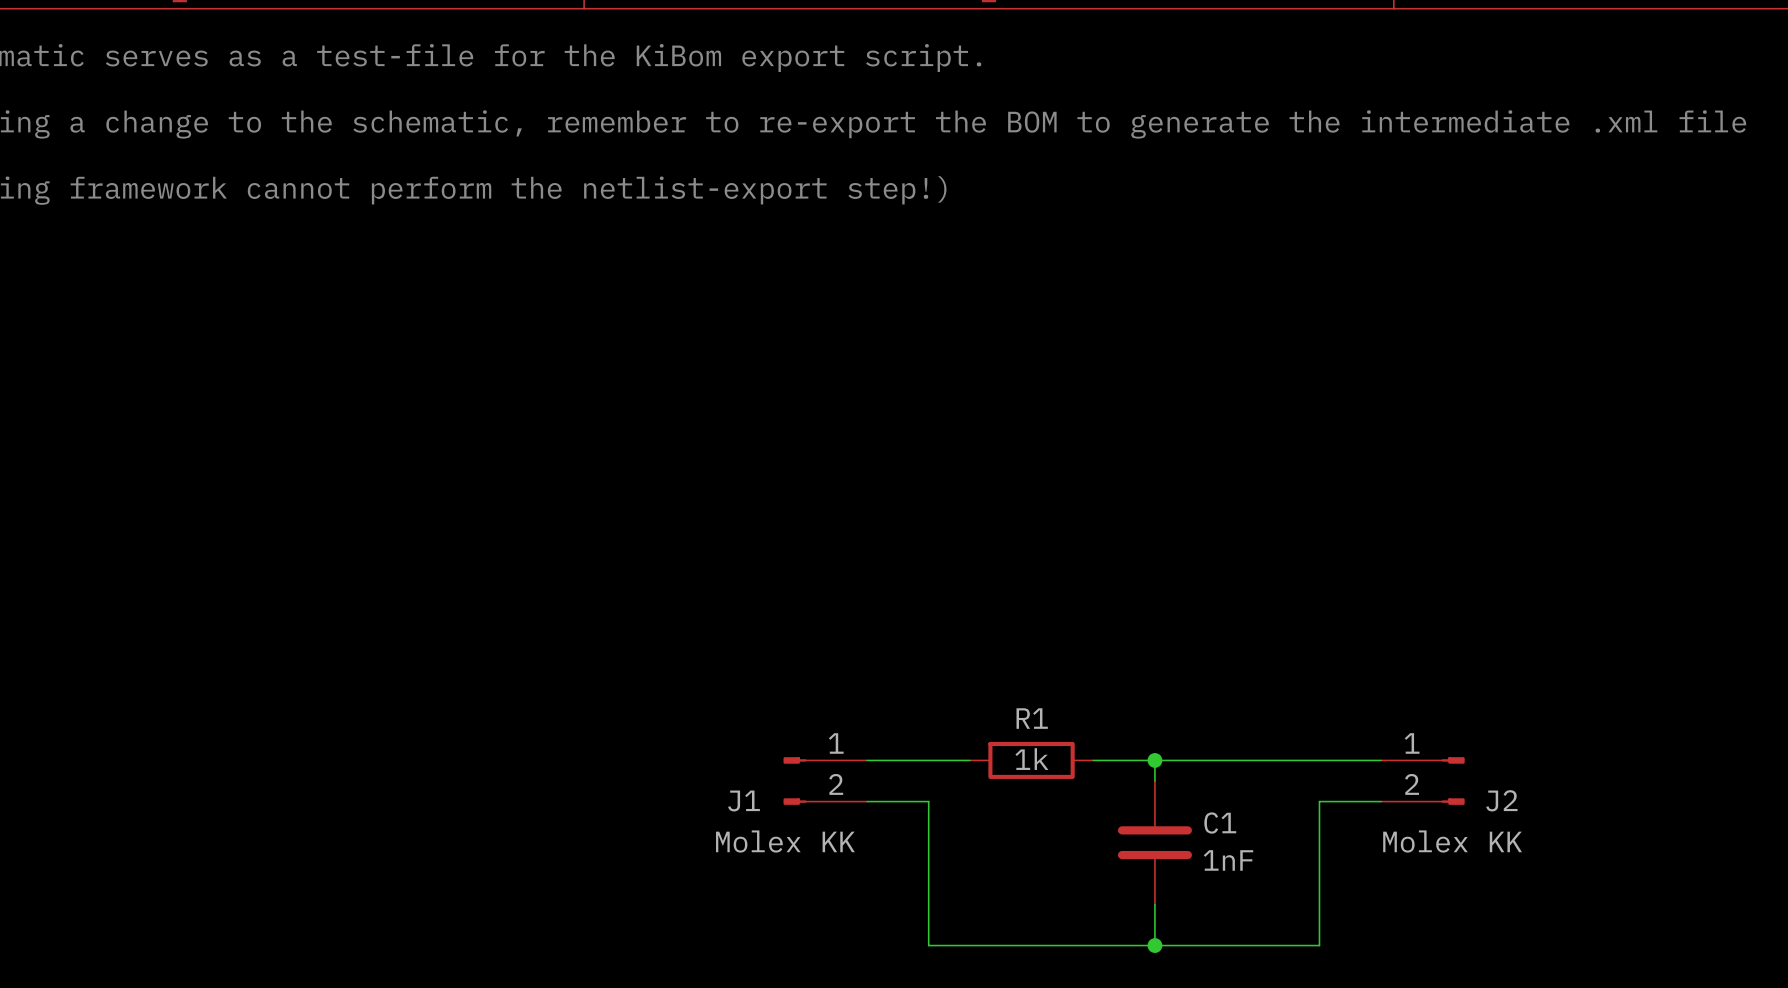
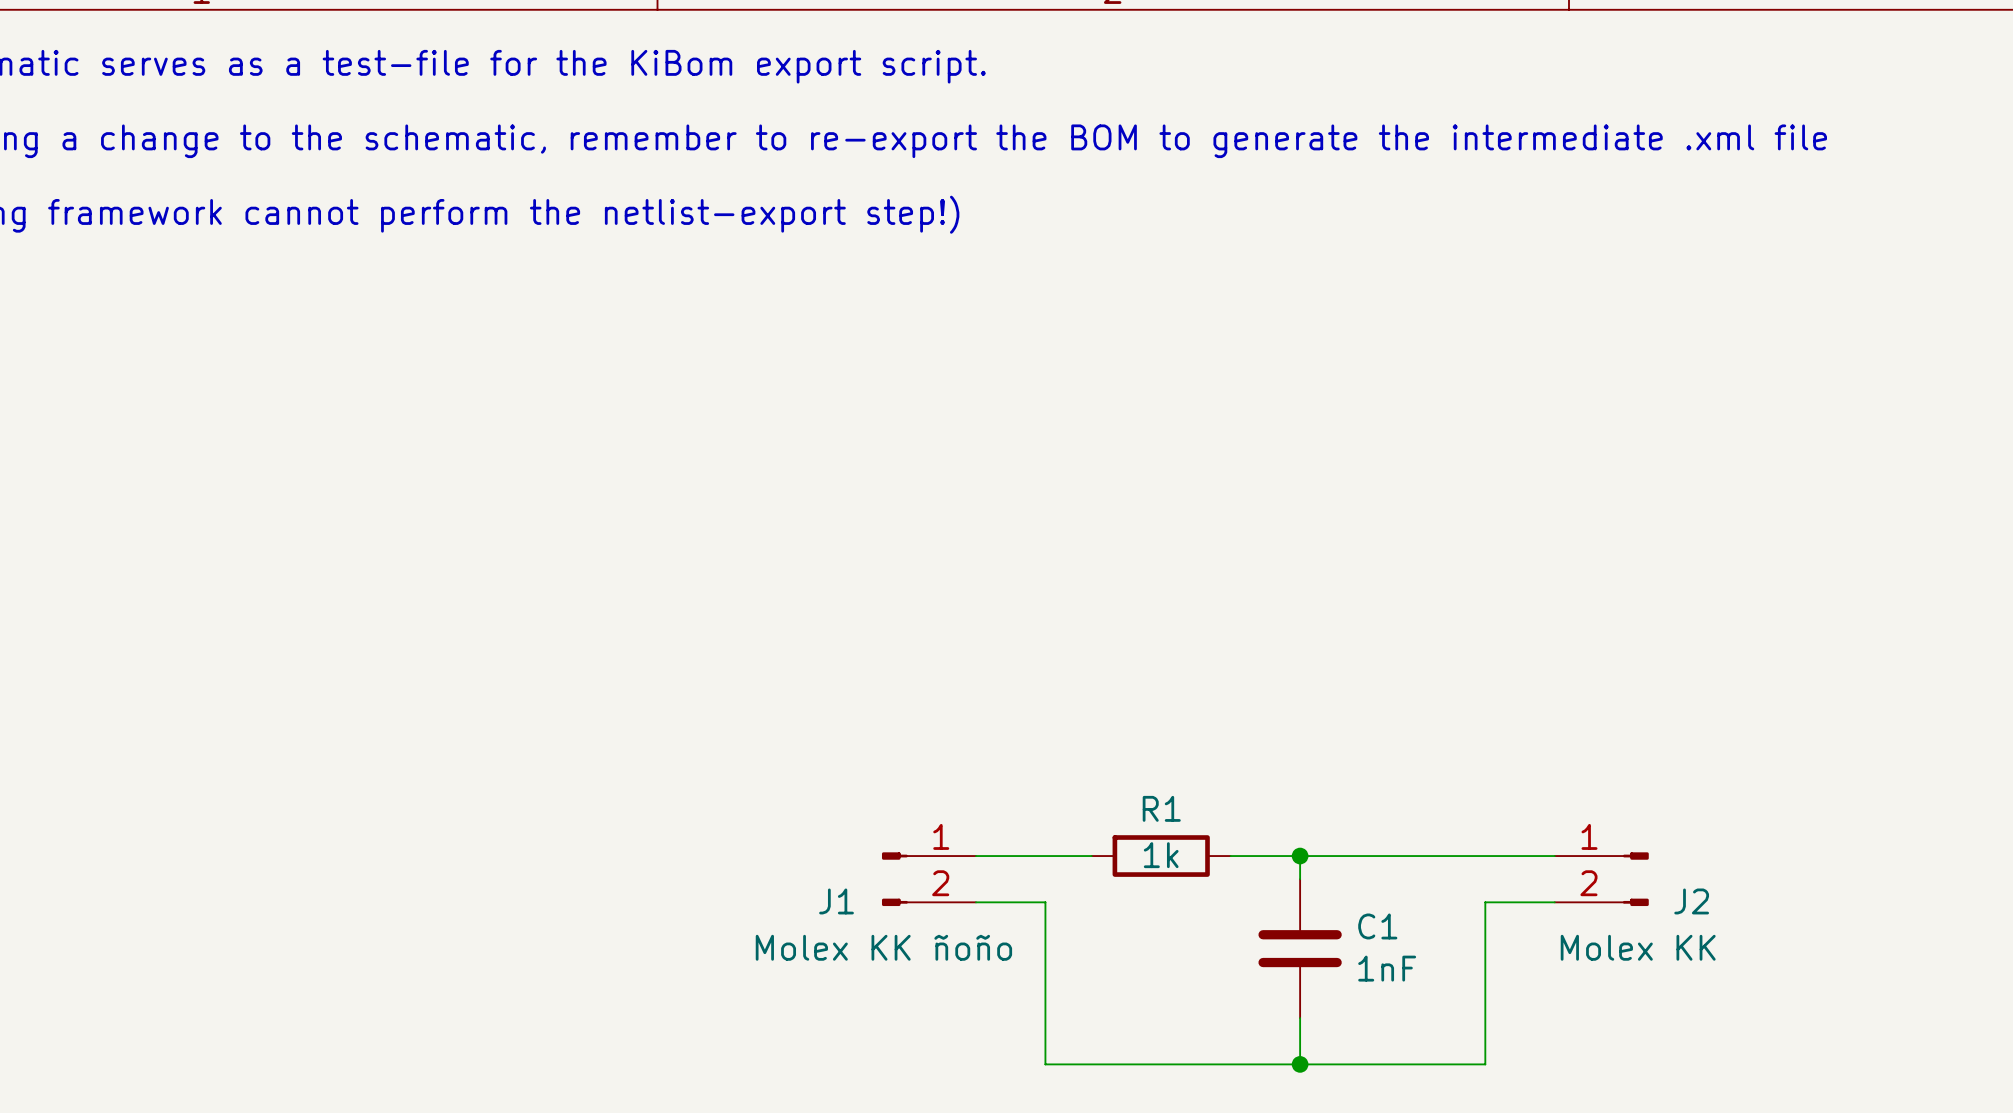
J1 value: Molex KK (785, 841) -> Molex KK ñoño (883, 947)

